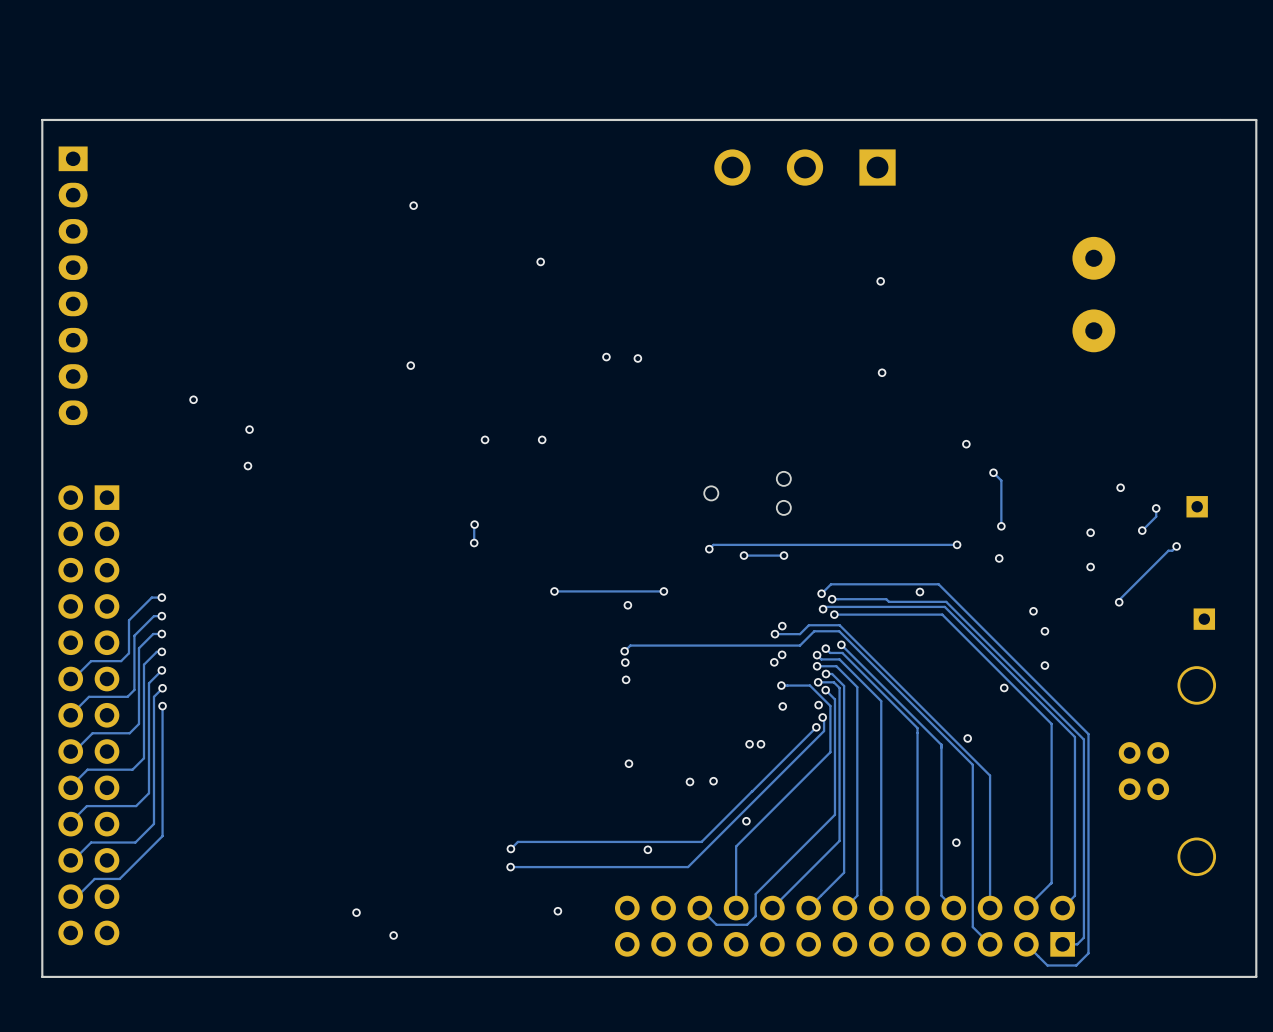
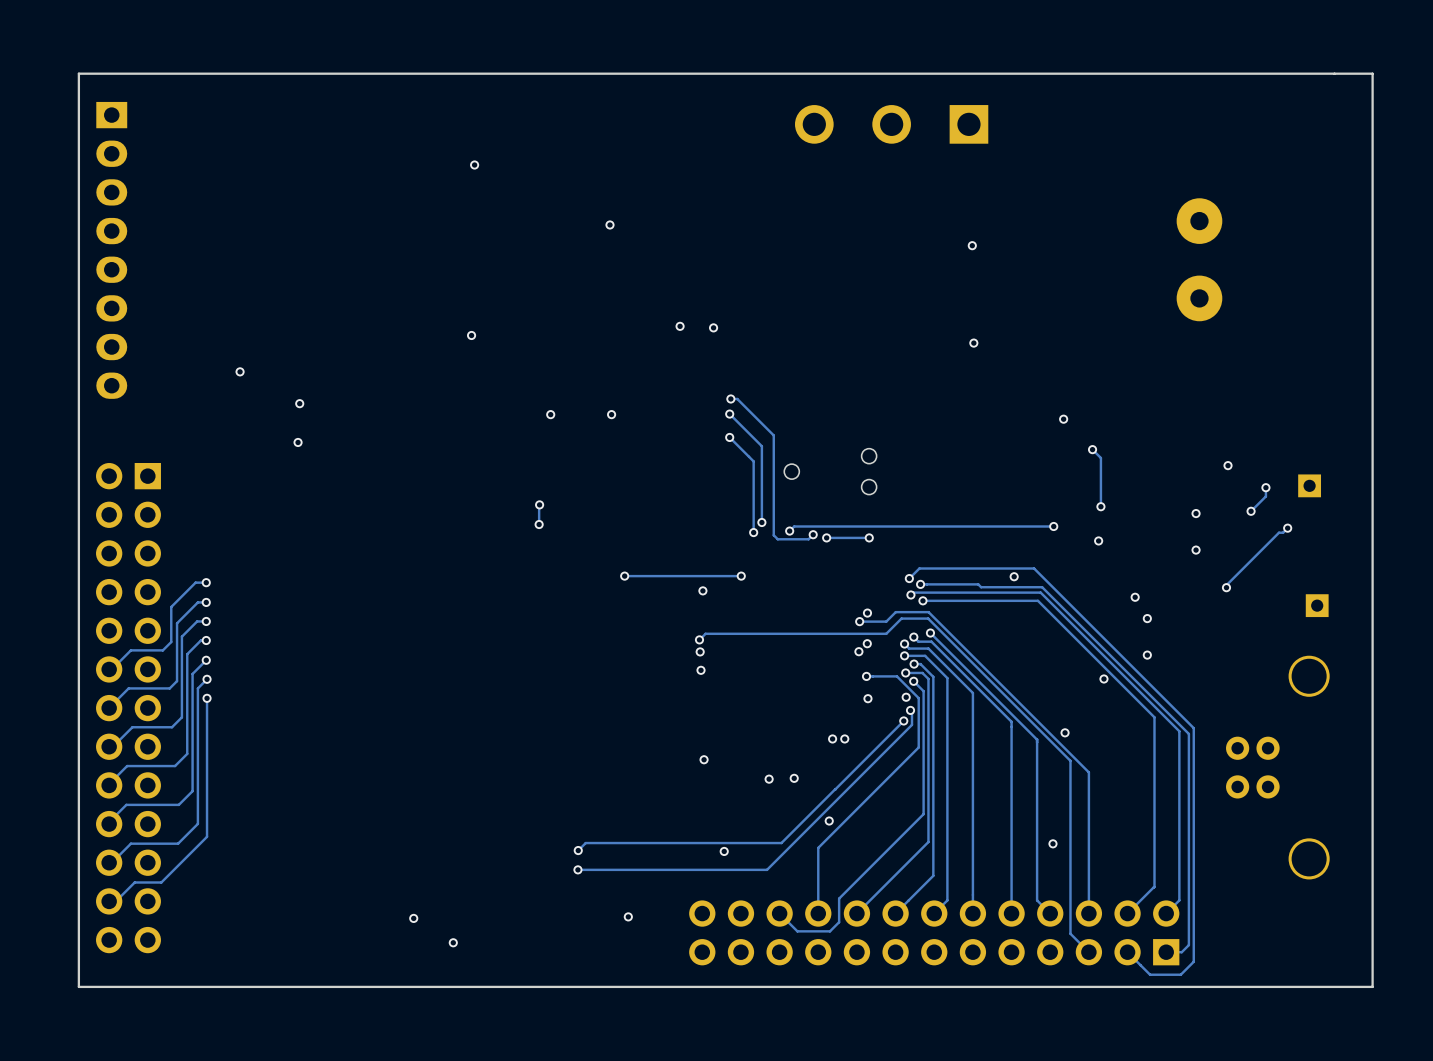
track: none -> (730, 398) (737, 398) (773, 435) (773, 535) (777, 539) (808, 539) (813, 534)
via: none -> (730, 398)
track: none -> (729, 414) (761, 446) (761, 522)
via: none -> (729, 414)
track: none -> (729, 437) (753, 461) (753, 532)
via: none -> (729, 437)
via: none -> (761, 522)
via: none -> (753, 532)
via: none -> (813, 534)

